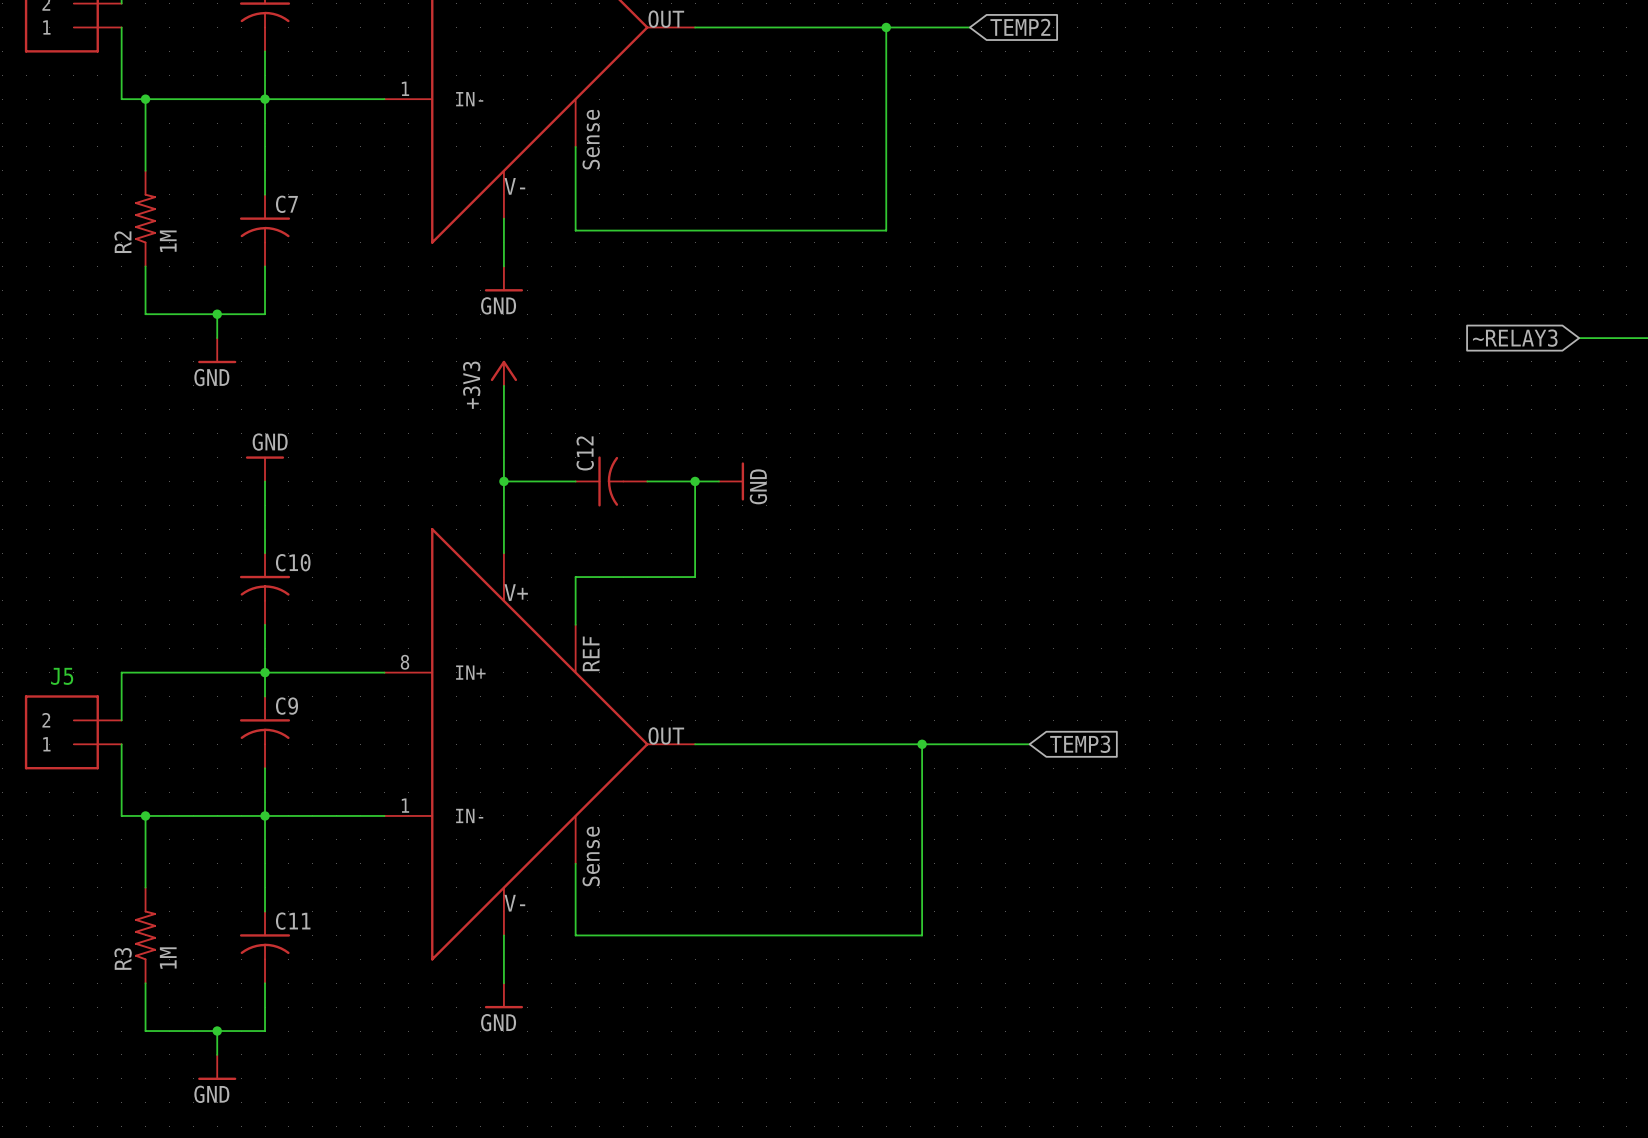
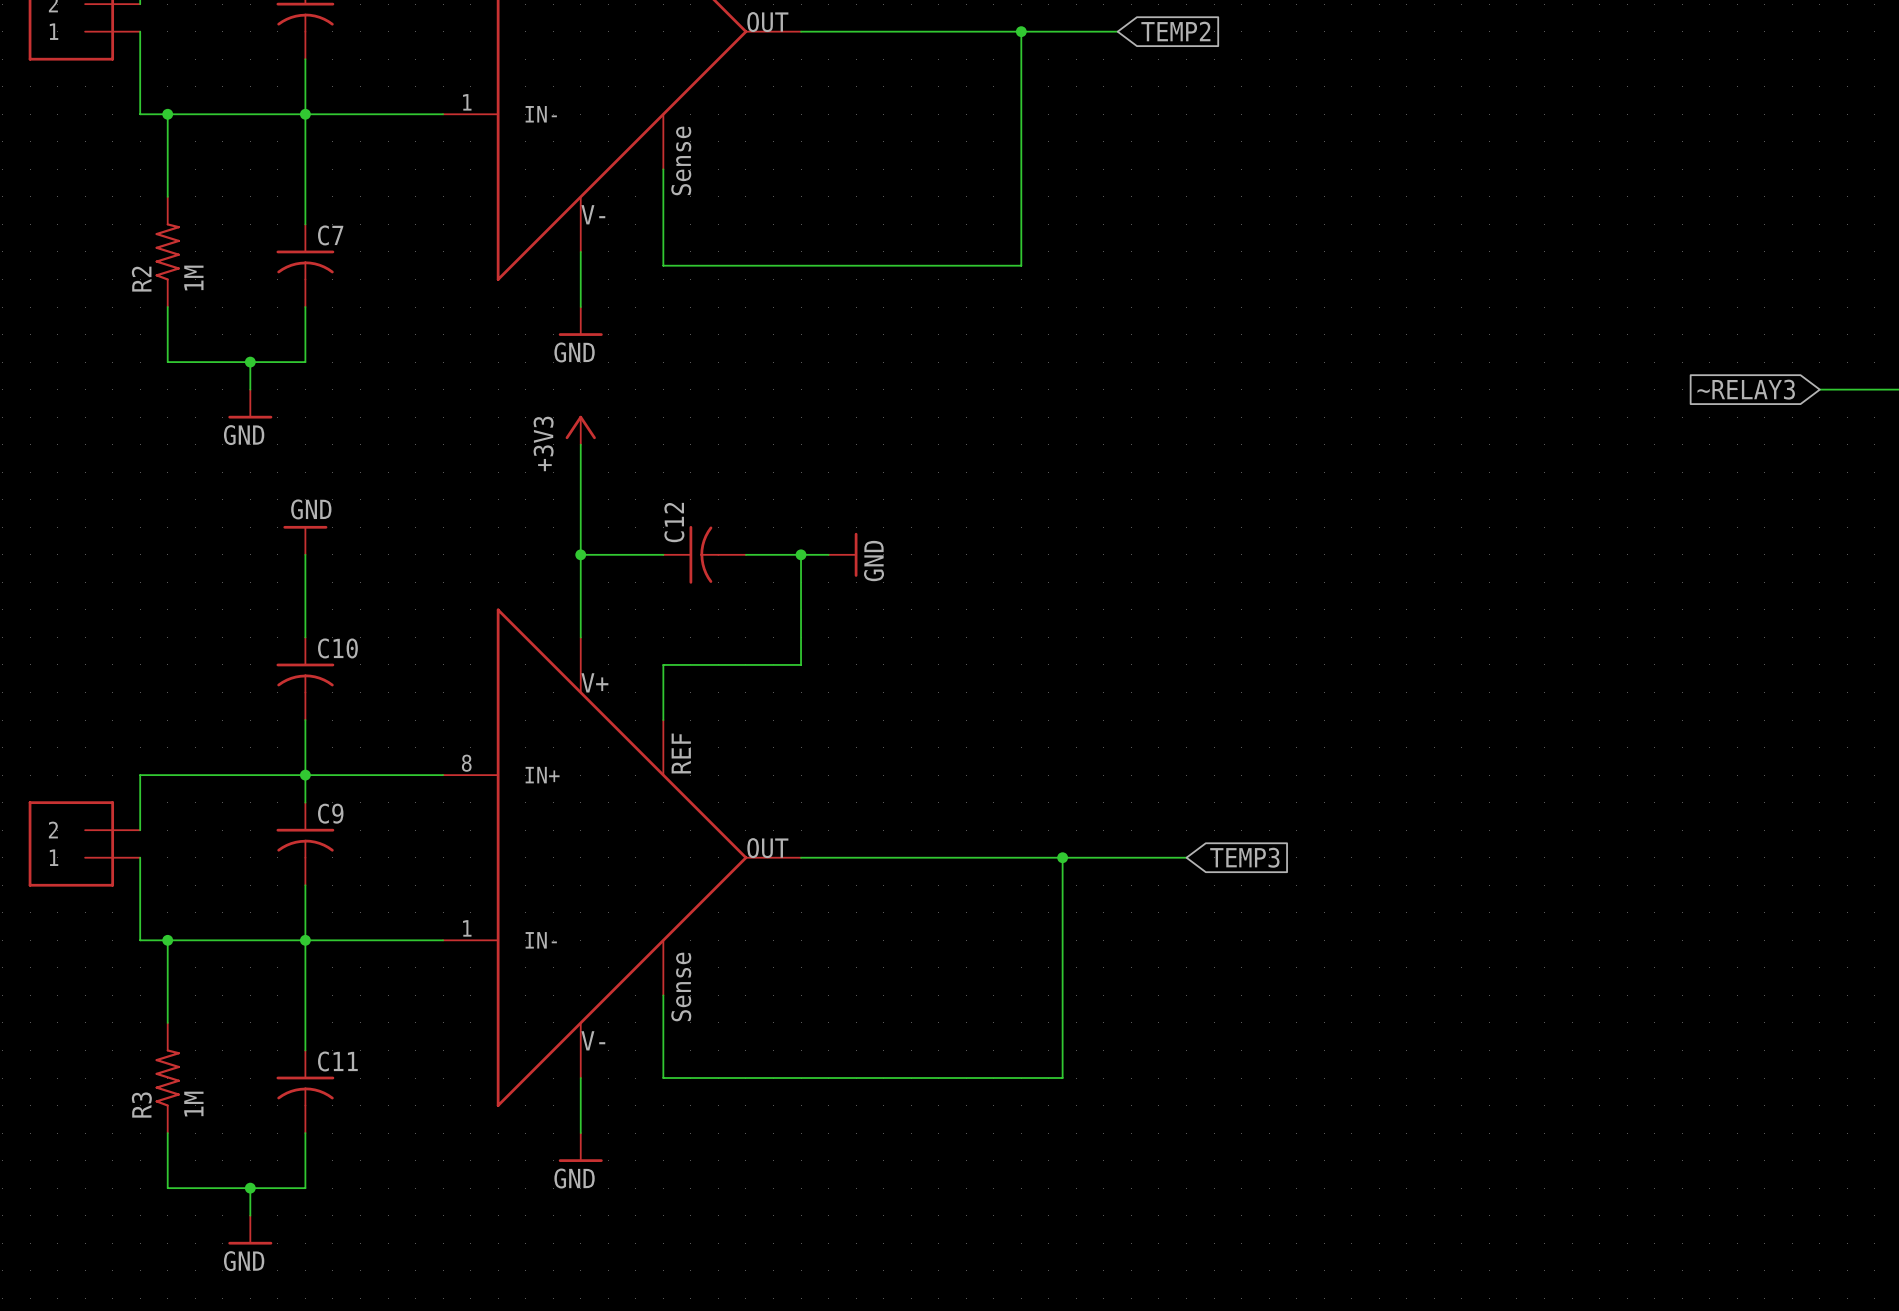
text: J5 (62, 676) -> none

